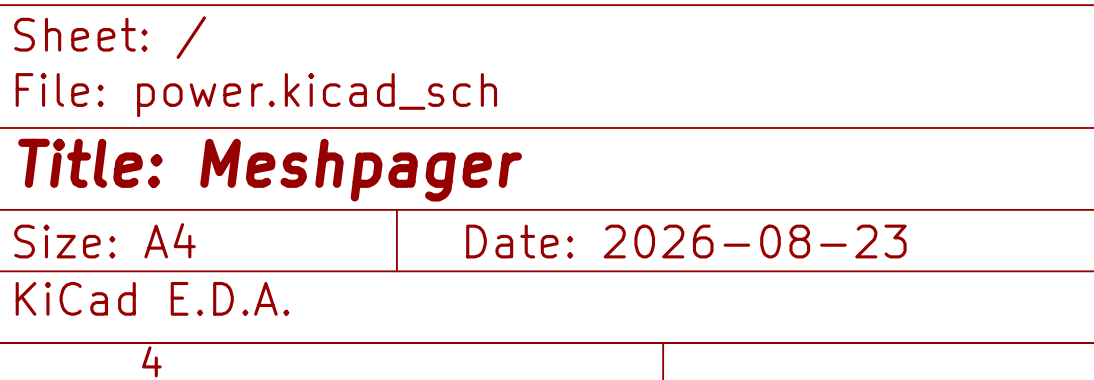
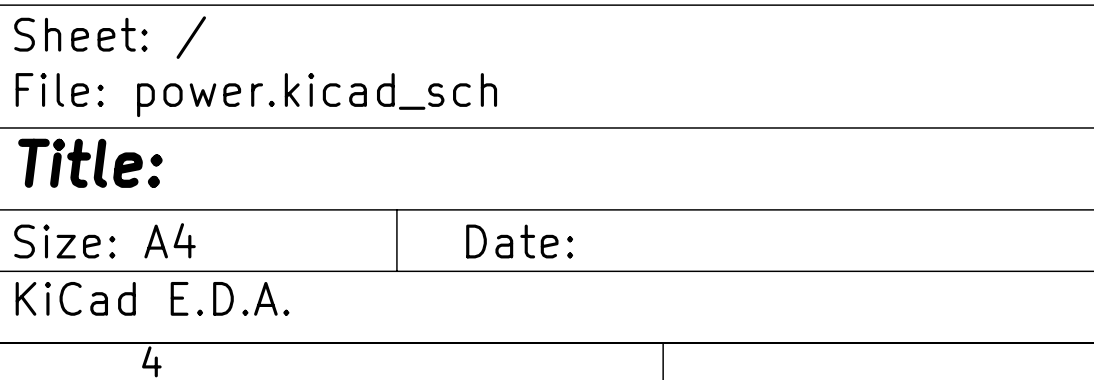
title block: Title: Meshpager (270, 170) -> Title: (90, 163)
title block: Date: 2026-08-23 (686, 241) -> Date: (519, 241)

